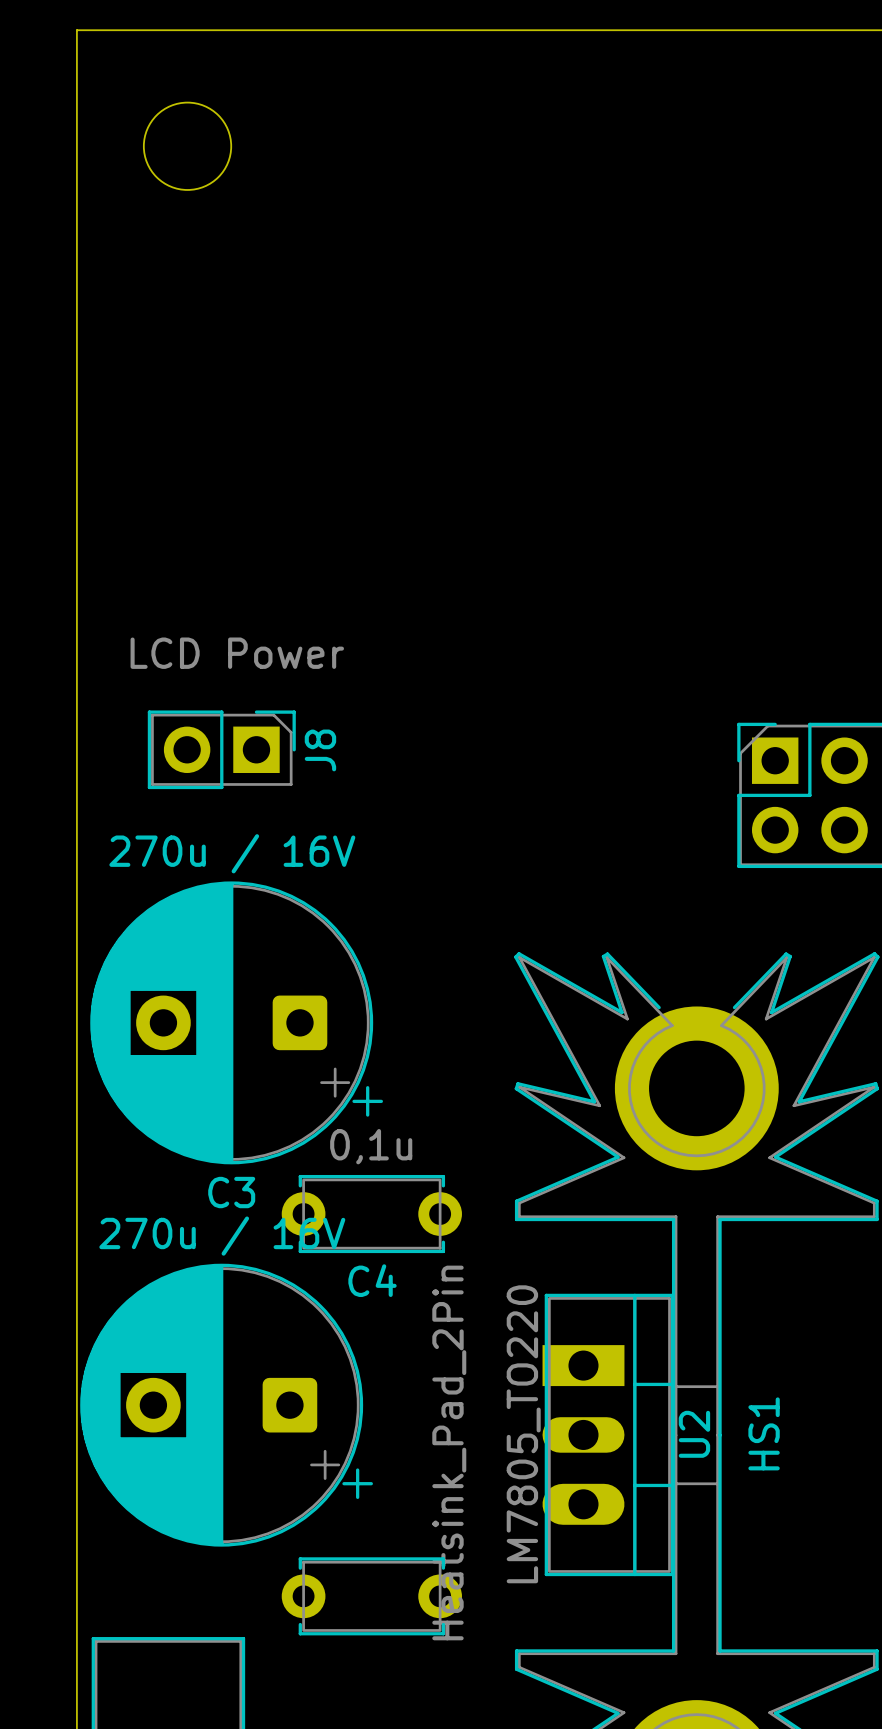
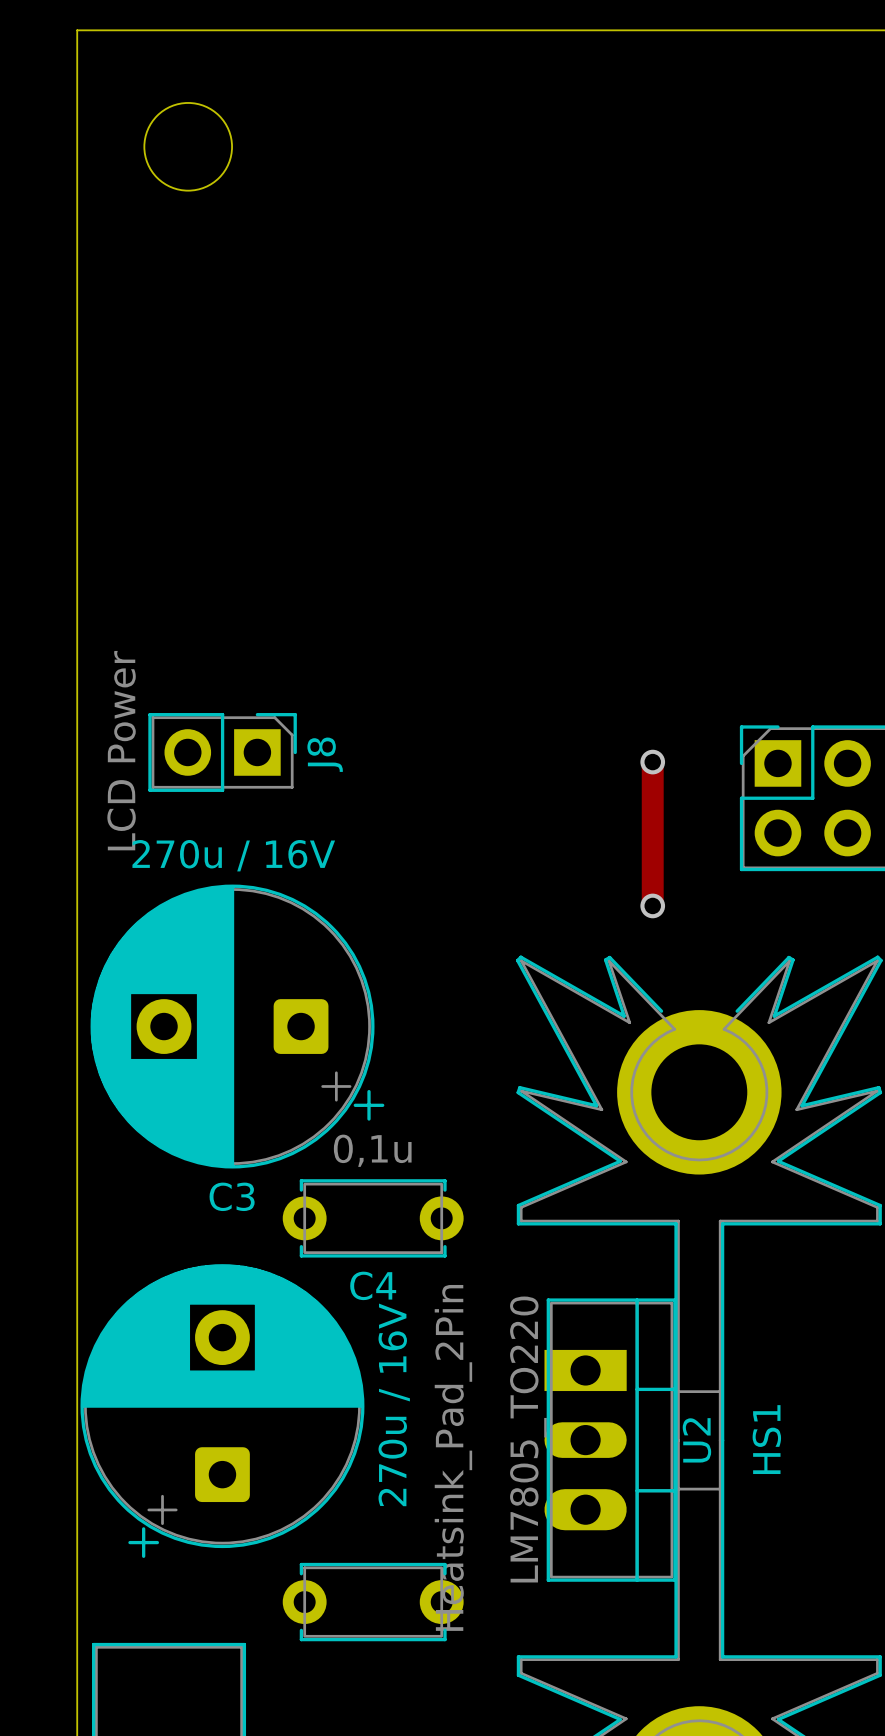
J8 value rotation: 0° (237, 653) -> 90° counterclockwise (121, 750)
track: none -> (652, 762) (652, 905)
via: none -> (652, 762)
via: none -> (652, 905)
part rotation: 0° (226, 1405) -> 90° clockwise (222, 1411)

